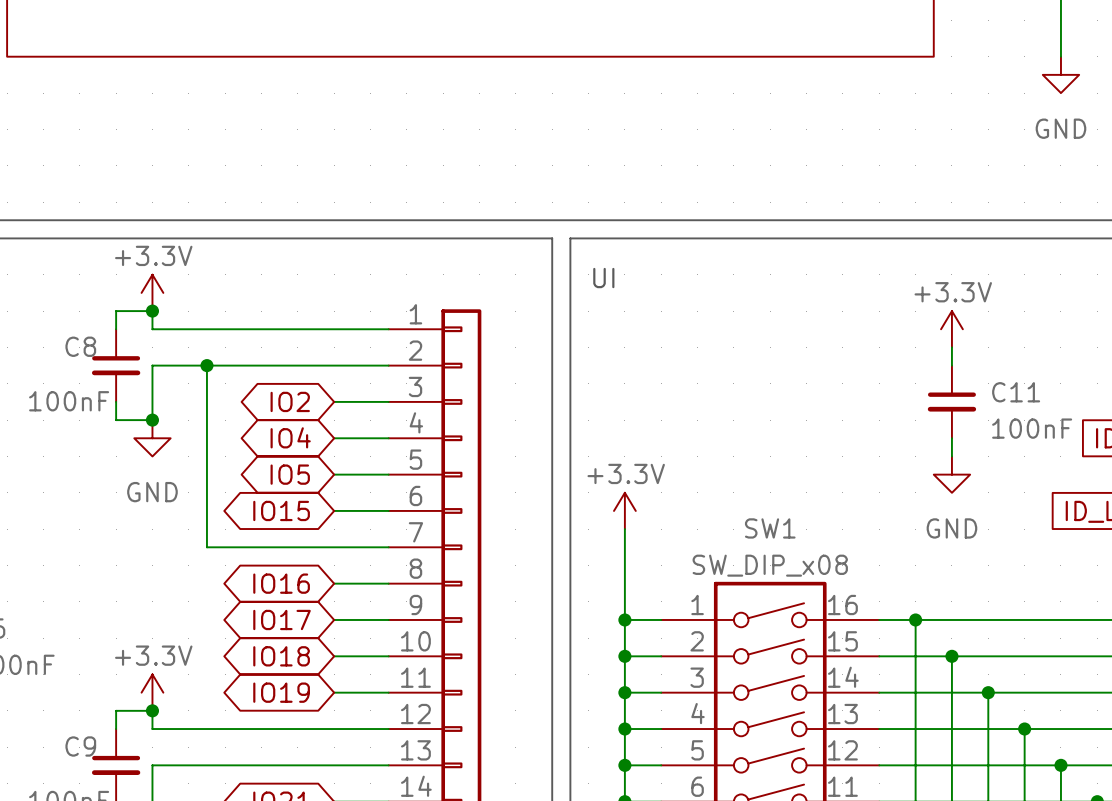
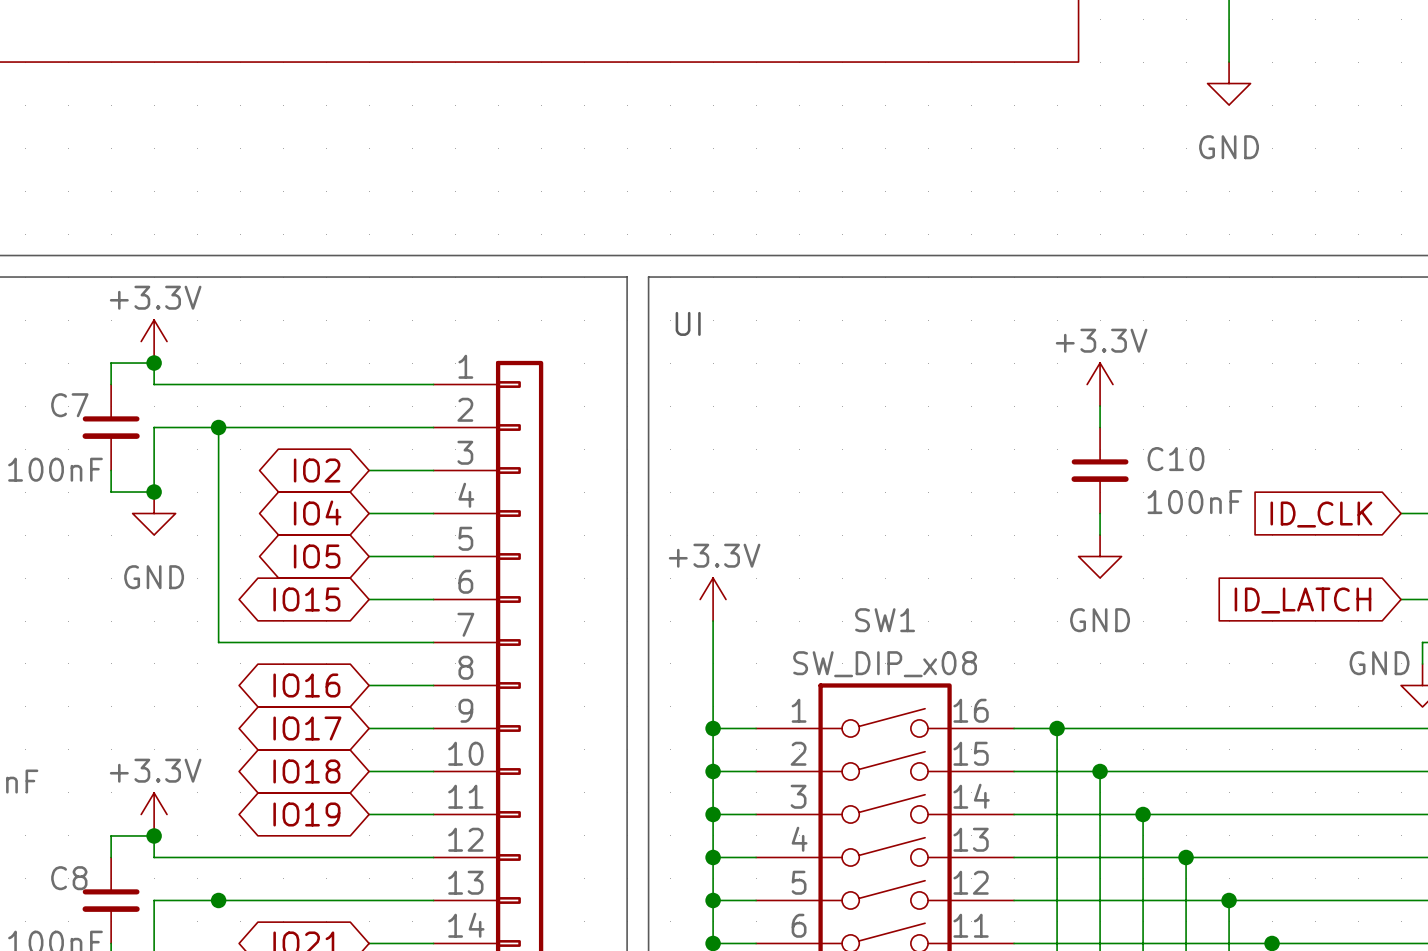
C8 name: C8 (80, 346) -> C7 (69, 405)
C11 name: C11 (1016, 392) -> C10 (1175, 459)
C9 name: C9 (80, 746) -> C8 (69, 878)
junction: none -> (218, 900)

